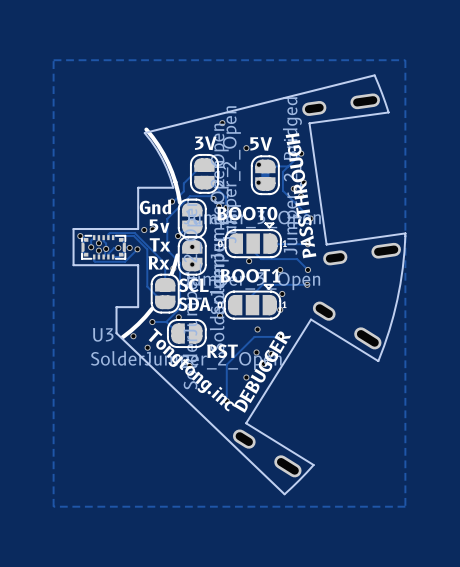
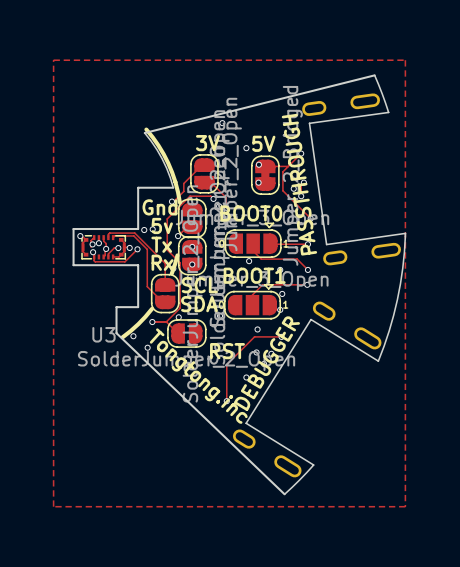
via: none -> (92, 244)
via: (91, 247) -> none
via: (98, 250) -> none
via: none -> (93, 252)

